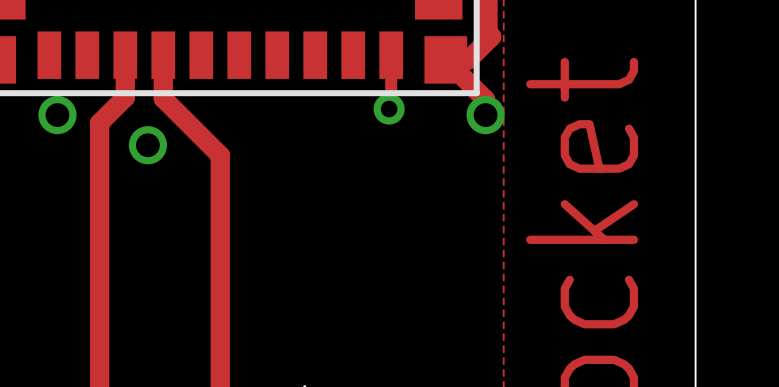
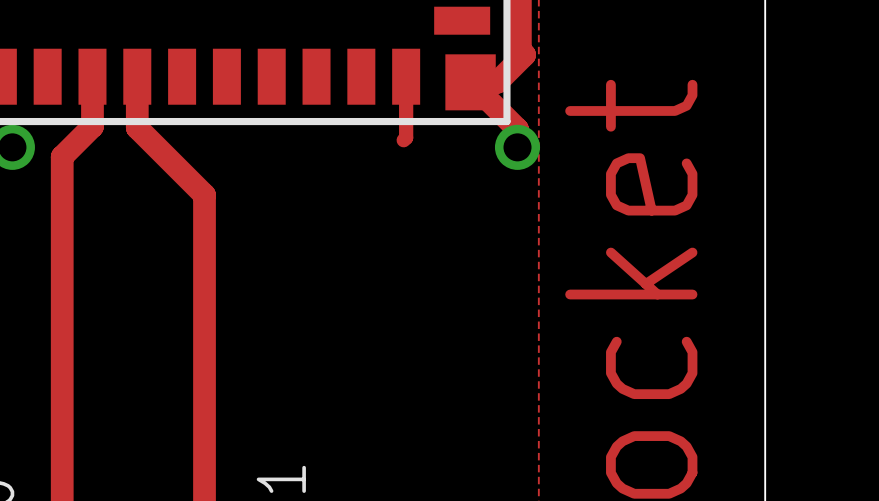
via: (389, 109) -> none
via: (147, 145) -> none

